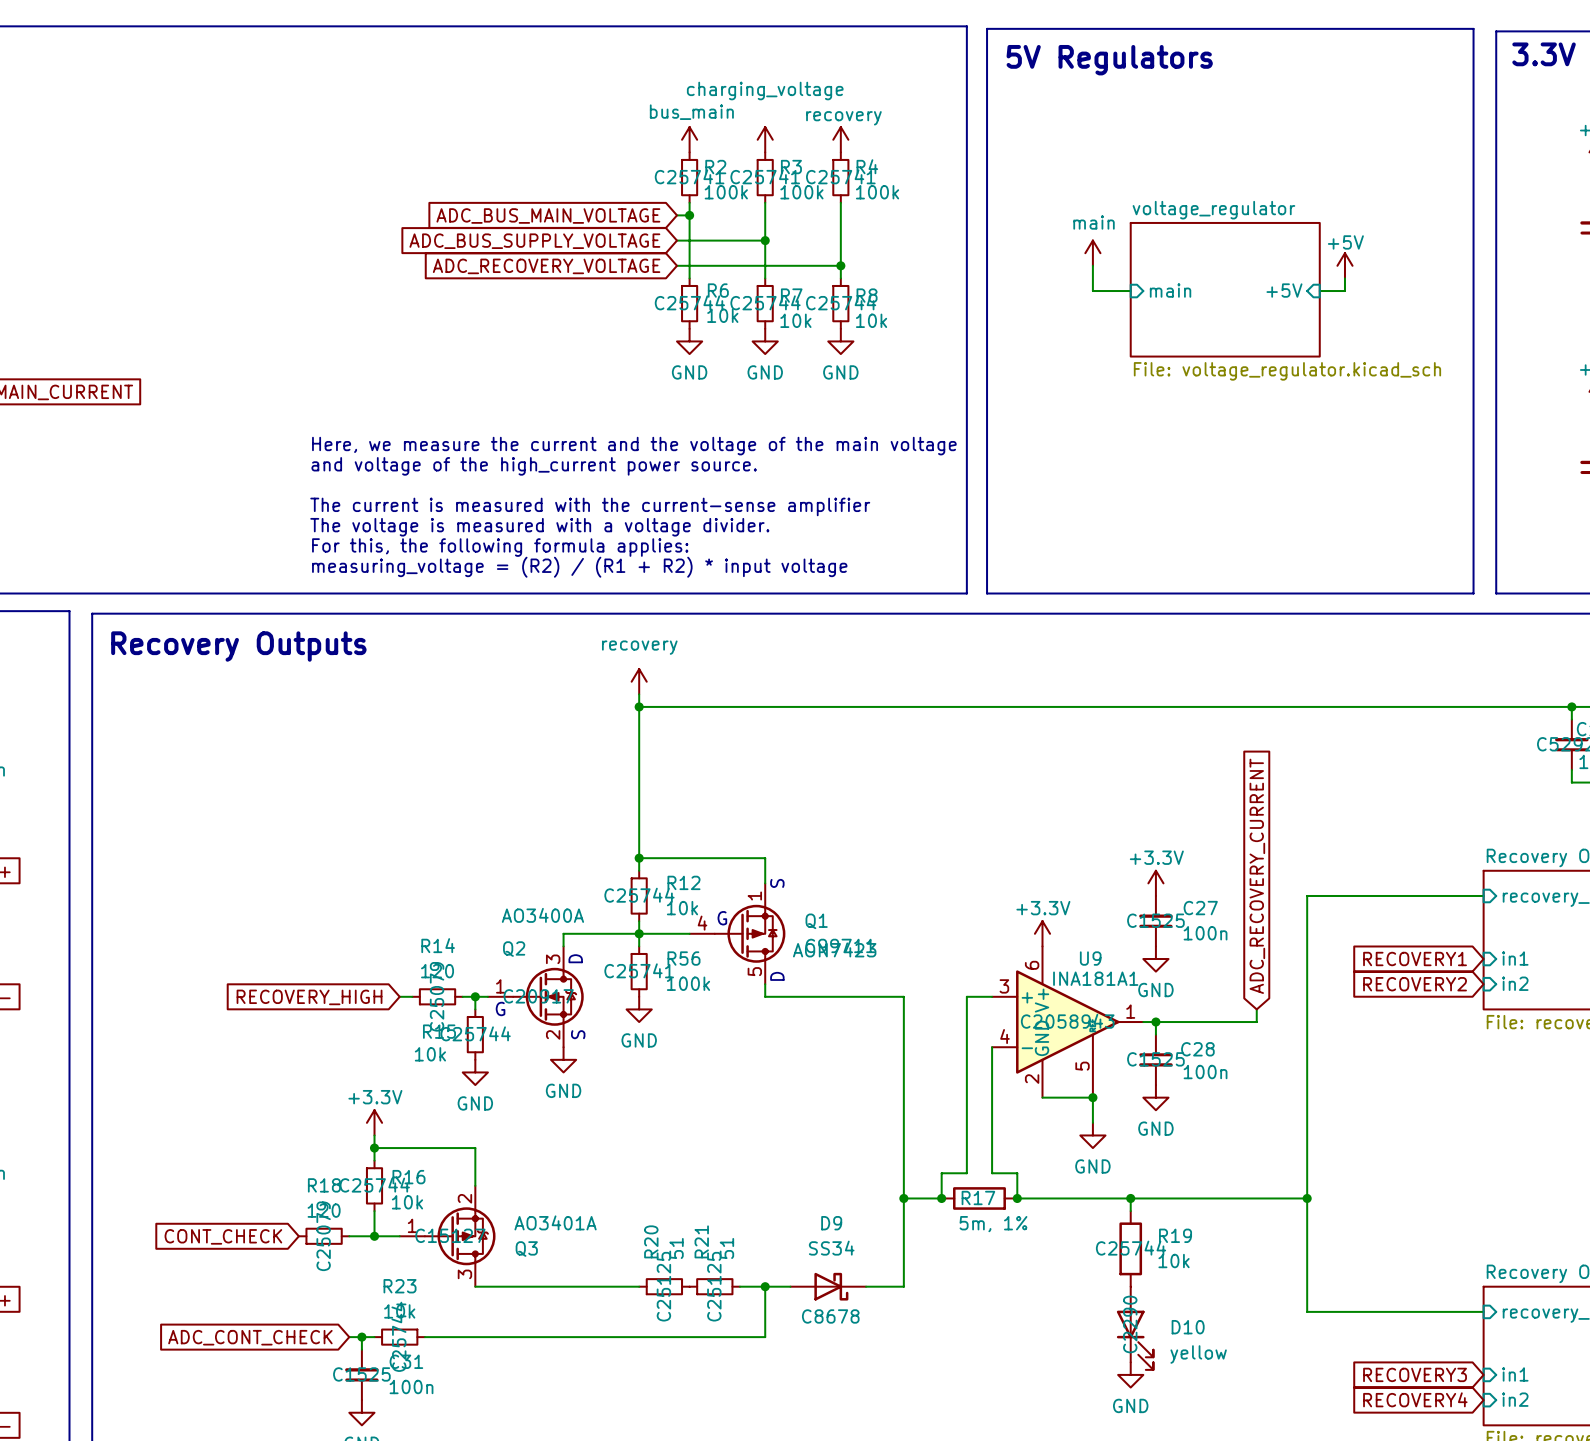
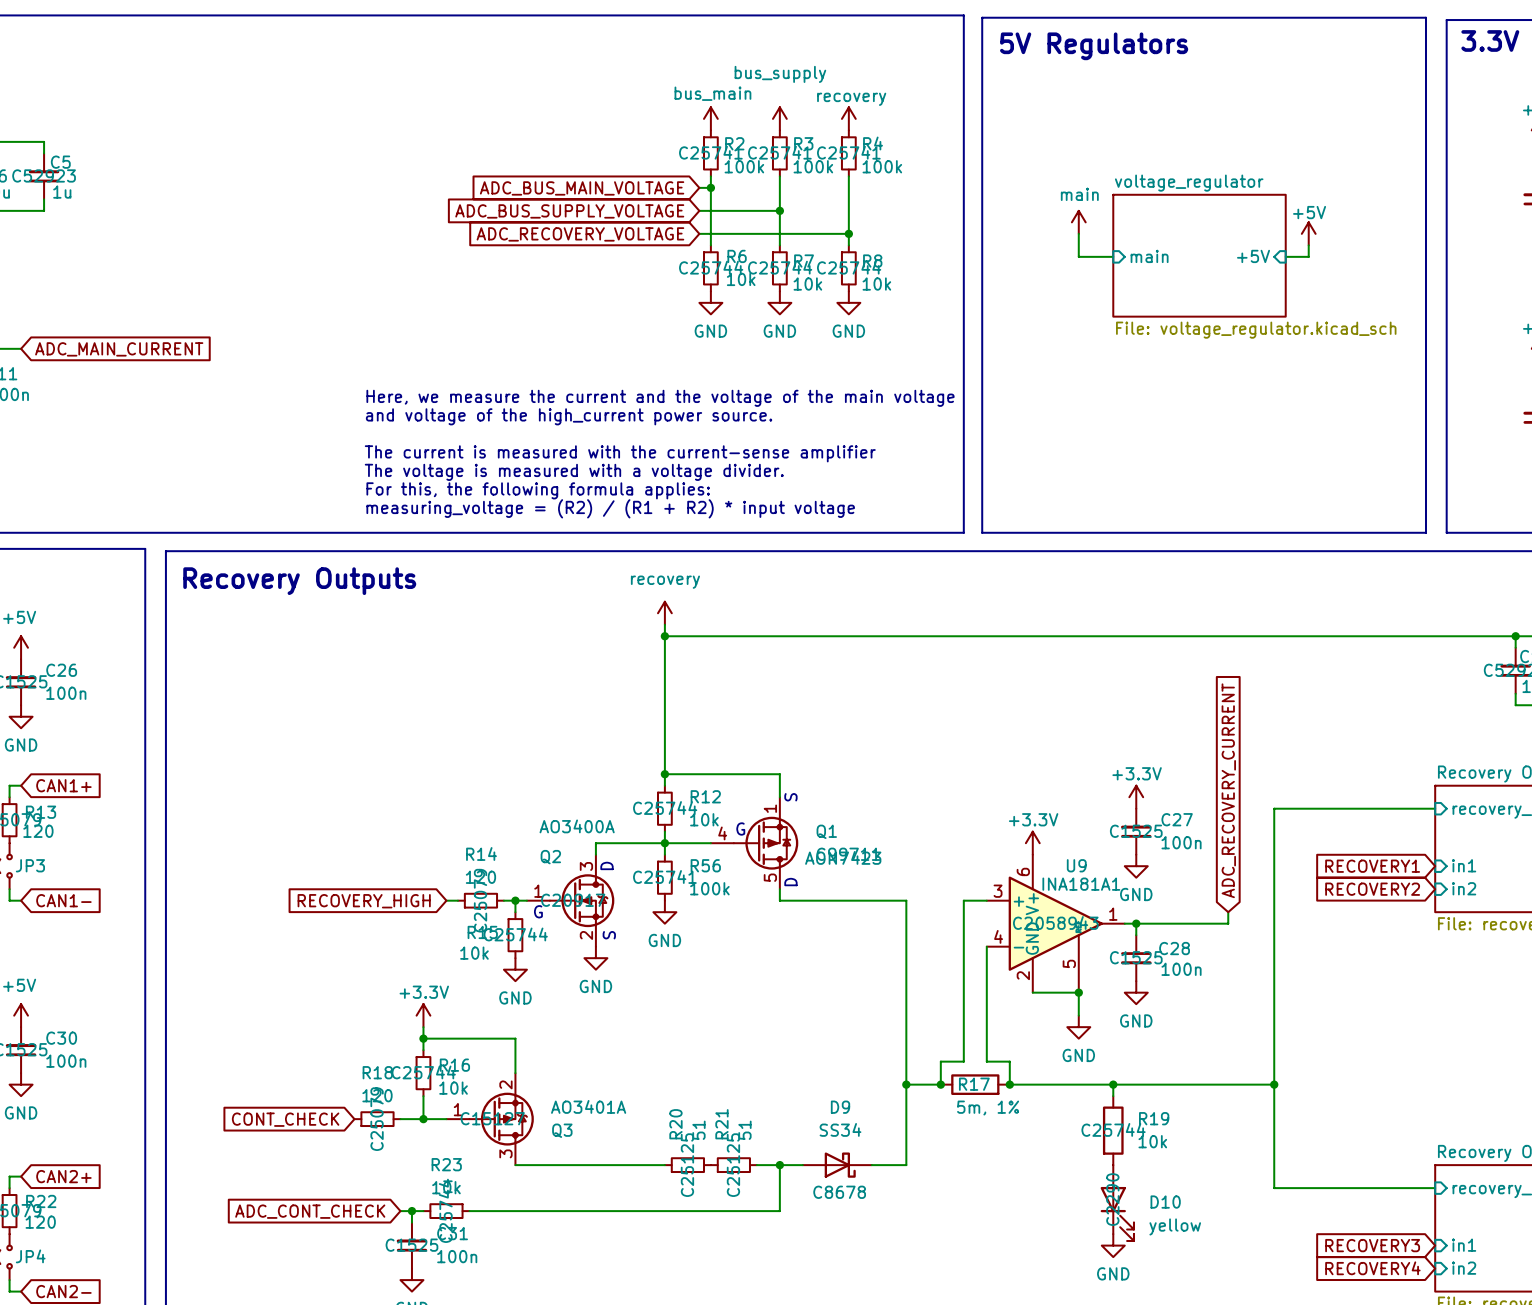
power symbol: charging_voltage (765, 139) -> bus_supply (779, 118)

